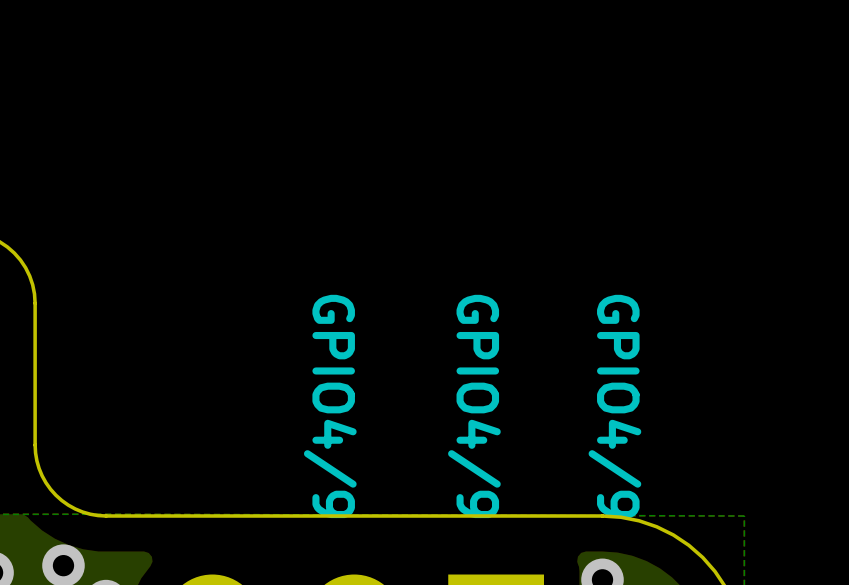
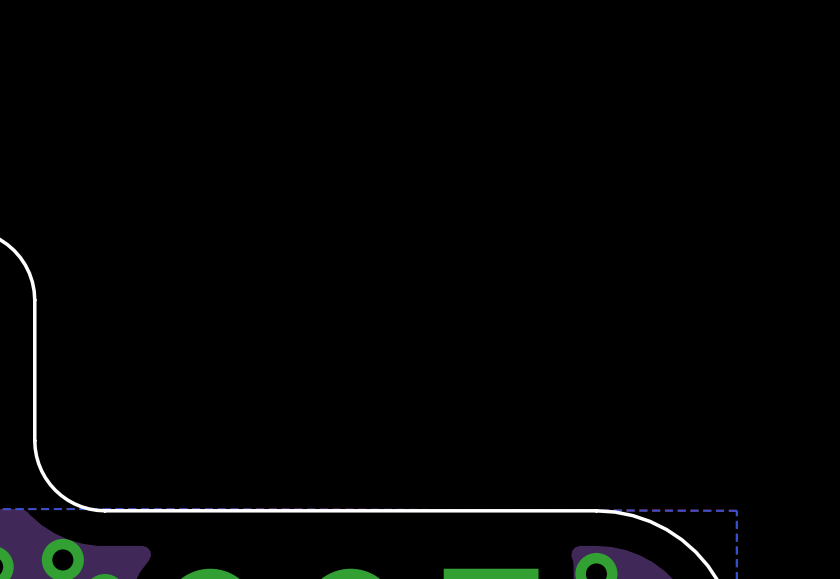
text: GPIO4/9 (330, 406) -> none
text: GPIO4/9 (474, 406) -> none
text: GPIO4/9 (614, 406) -> none

